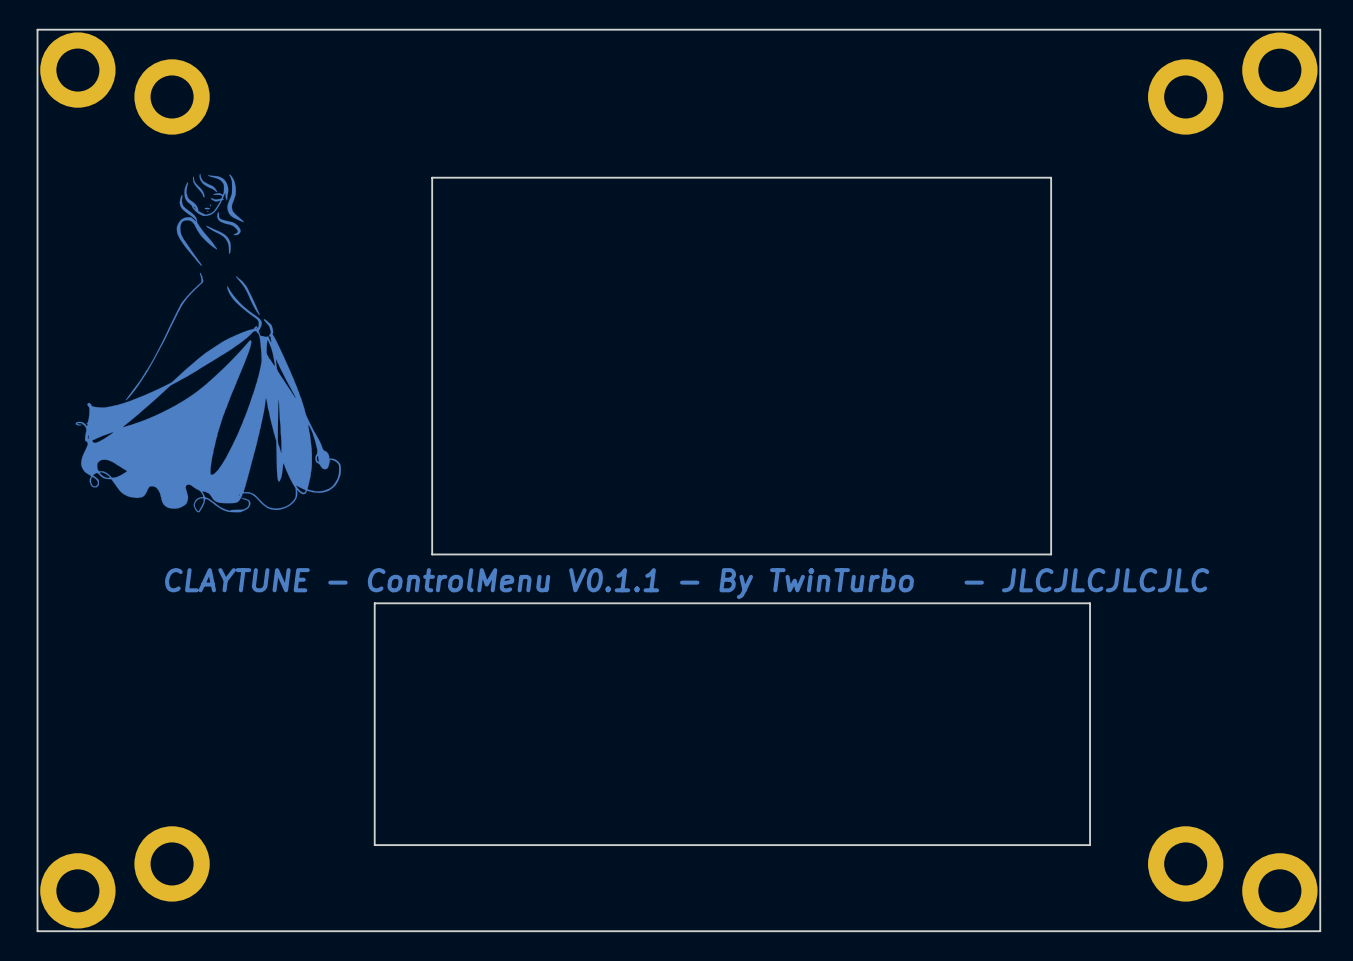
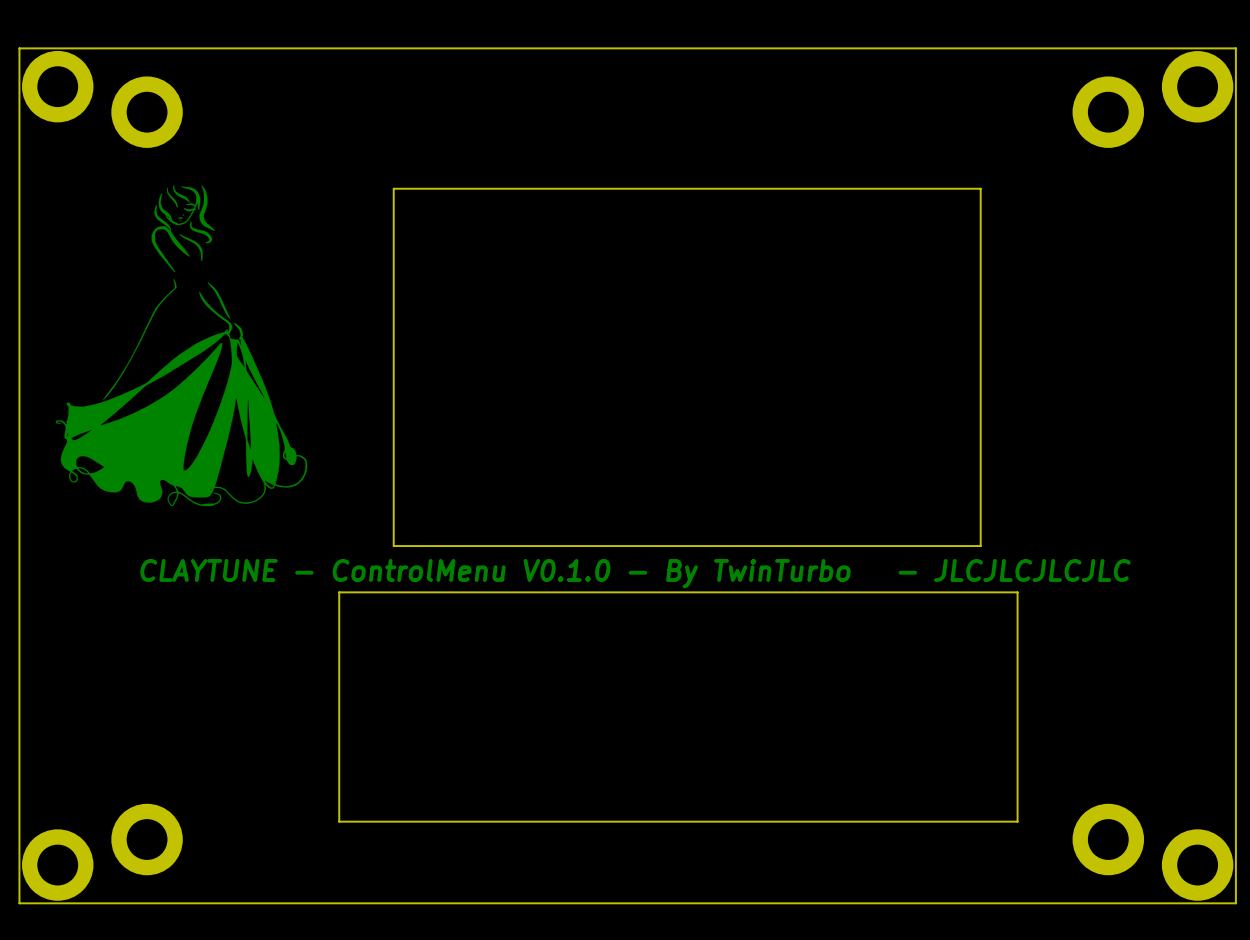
text: CLAYTUNE - ControlMenu V0.1.1 - By TwinTurbo - JLCJLCJLCJLC (687, 583) -> CLAYTUNE - ControlMenu V0.1.0 - By TwinTurbo - JLCJLCJLCJLC (635, 573)

